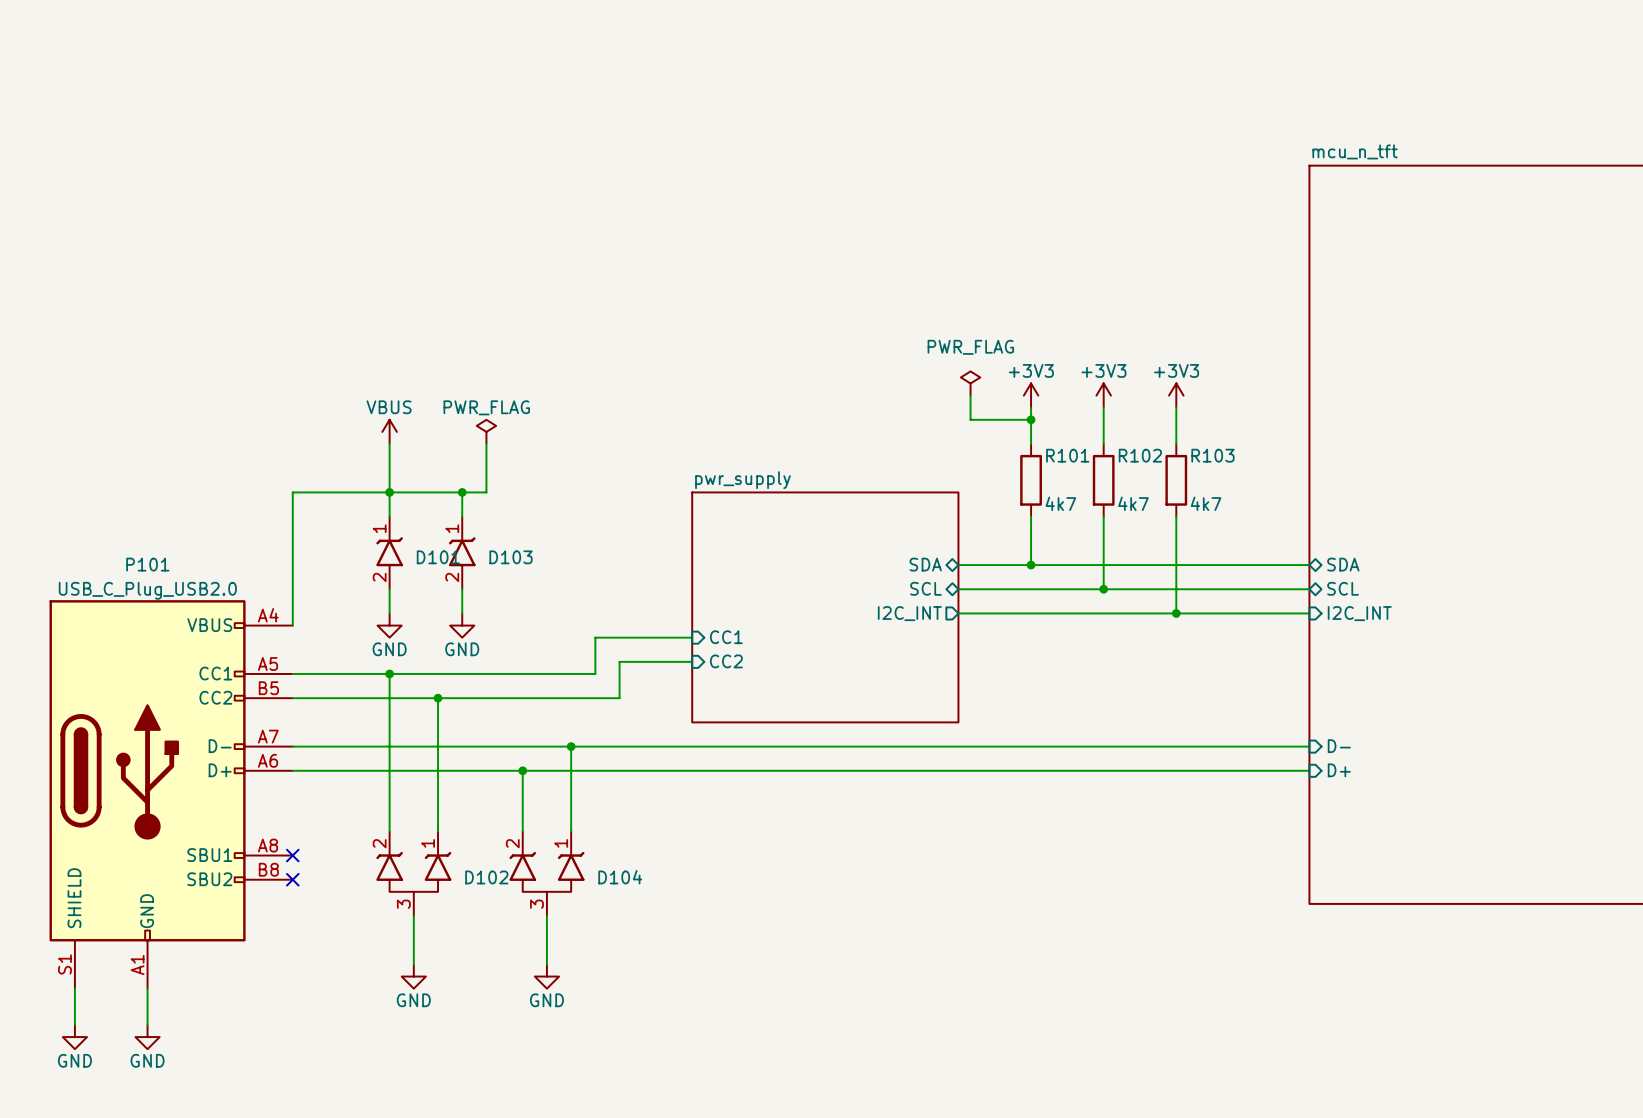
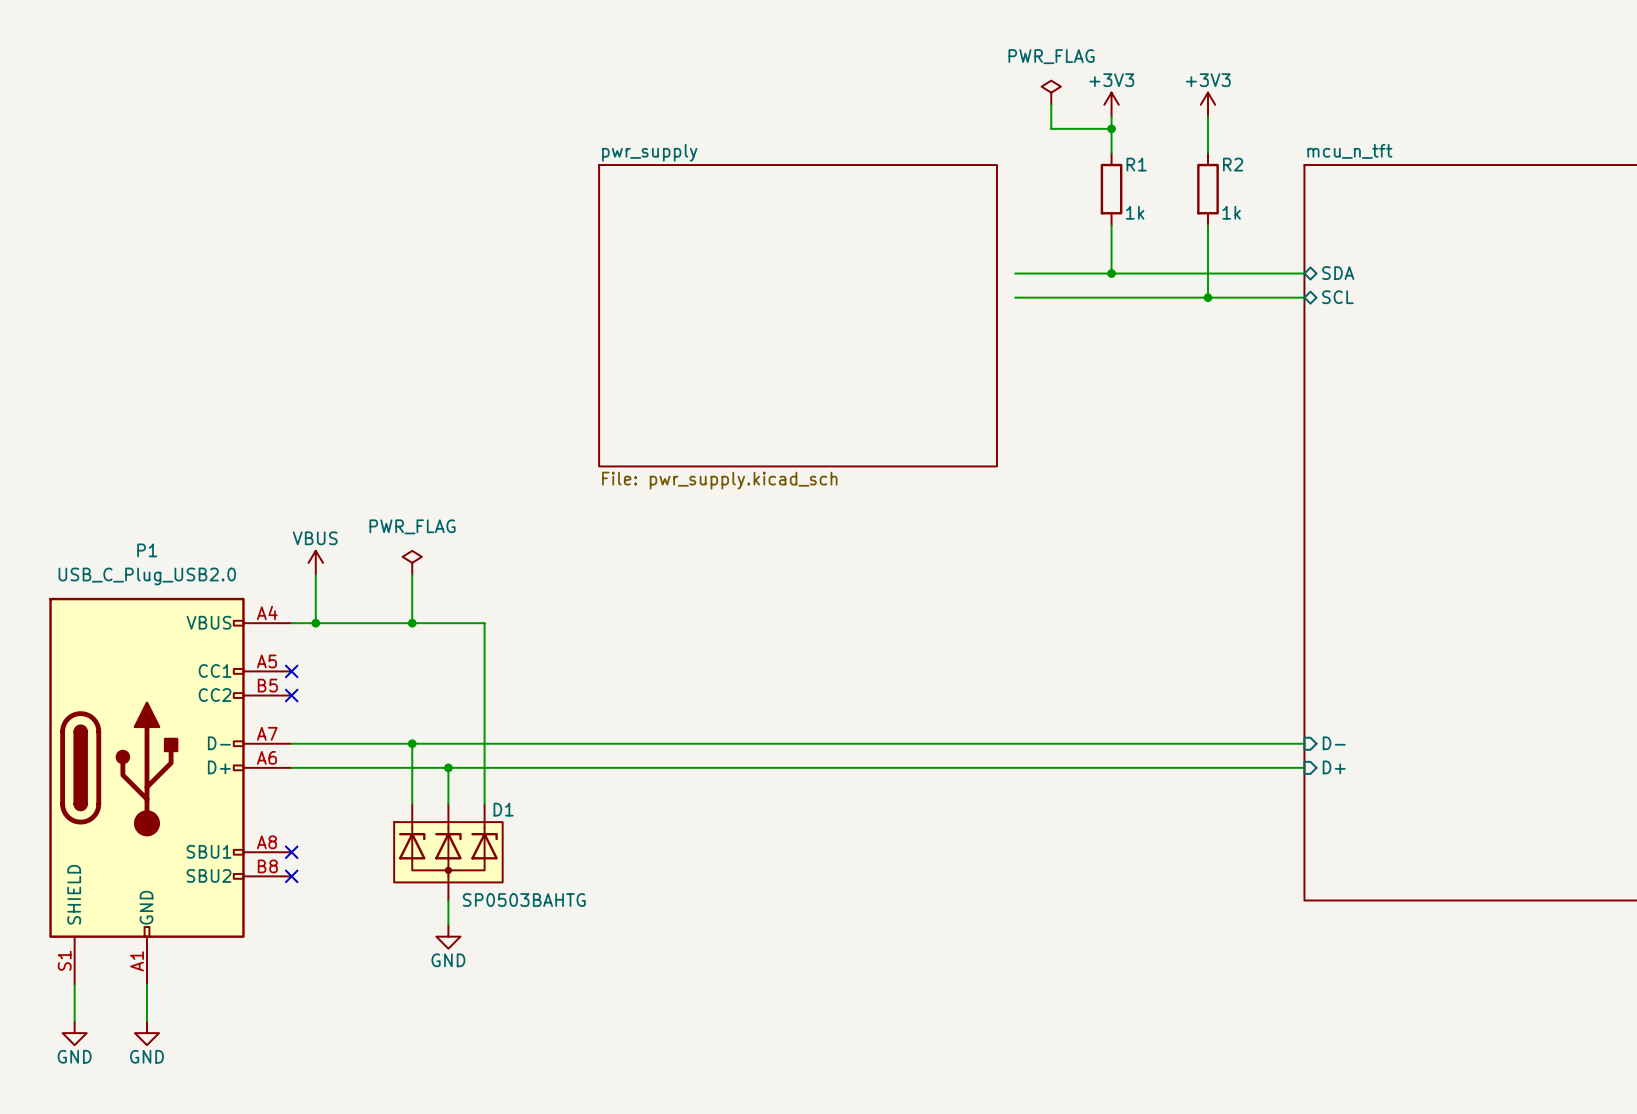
power symbol: none -> PWR_FLAG (1051, 92)
wire: none -> (1051, 104) (1051, 128) (1111, 128)
power symbol: none -> +3V3 (1111, 104)
power symbol: none -> +3V3 (1208, 104)
wire: none -> (1111, 116) (1111, 152)
wire: none -> (1208, 116) (1208, 152)
junction: none -> (1111, 128)
R1: none -> 1k (1111, 189)
R2: none -> 1k (1208, 189)
wire: none -> (1111, 225) (1111, 273)
wire: none -> (1208, 225) (1208, 297)
wire: none -> (1015, 273) (1304, 273)
junction: none -> (1111, 273)
sheet pin: none -> SDA (1338, 273)
wire: none -> (1015, 297) (1304, 297)
junction: none -> (1208, 297)
sheet pin: none -> SCL (1337, 297)
sheet pwr_supply: none -> File: pwr_supply.kicad_sch (798, 315)
power symbol: PWR_FLAG (970, 383) -> none
wire: (970, 395) (970, 419) (1031, 419) -> none
power symbol: +3V3 (1031, 395) -> none
power symbol: +3V3 (1103, 395) -> none
power symbol: +3V3 (1176, 395) -> none
power symbol text position: PWR_FLAG (486, 407) -> PWR_FLAG (412, 526)
wire: (1031, 407) (1031, 444) -> none
wire: (1103, 407) (1103, 444) -> none
wire: (1176, 407) (1176, 444) -> none
junction: (1031, 419) -> none
power symbol position: VBUS (389, 431) -> VBUS (315, 562)
power symbol position: PWR_FLAG (486, 431) -> PWR_FLAG (412, 562)
wire: (389, 444) (389, 516) -> none
wire: (486, 444) (486, 492) (292, 492) (292, 625) -> (484, 804) (484, 623) (291, 623)
R101: 4k7 (1031, 480) -> none
R102: 4k7 (1103, 480) -> none
R103: 4k7 (1176, 480) -> none
junction: (389, 492) -> none
wire: (462, 492) (462, 516) -> none
junction: (462, 492) -> none
wire: (1031, 516) (1031, 565) -> none
wire: (1103, 516) (1103, 589) -> none
wire: (1176, 516) (1176, 613) -> none
D101: (389, 552) -> none
D103: (462, 552) -> none
sheet pin: SDA (925, 564) -> none
sheet pin: SDA (1343, 564) -> none
wire: (958, 565) (1309, 565) -> none
junction: (1031, 565) -> none
wire: none -> (315, 574) (315, 623)
wire: none -> (412, 574) (412, 623)
sheet pin: SCL (925, 588) -> none
sheet pin: SCL (1343, 588) -> none
wire: (389, 589) (389, 613) -> none
wire: (462, 589) (462, 613) -> none
wire: (958, 589) (1309, 589) -> none
junction: (1103, 589) -> none
sheet pwr_supply: (825, 607) -> none
sheet pin: I2C_INT (909, 613) -> none
wire: (958, 613) (1309, 613) -> none
junction: (1176, 613) -> none
sheet pin: I2C_INT (1359, 613) -> none
junction: none -> (315, 623)
power symbol: GND (389, 625) -> none
junction: none -> (412, 623)
power symbol: GND (462, 625) -> none
wire: (692, 637) (595, 637) (595, 673) (292, 673) -> none
sheet pin: CC1 (726, 637) -> none
wire: (692, 661) (619, 661) (619, 698) (292, 698) -> none
sheet pin: CC2 (726, 661) -> none
no-connect mark: none -> (291, 671)
wire: (389, 673) (389, 831) -> none
junction: (389, 673) -> none
no-connect mark: none -> (291, 695)
wire: (438, 698) (438, 831) -> none
junction: (438, 698) -> none
junction: none -> (412, 743)
wire: (571, 746) (571, 831) -> none
junction: (571, 746) -> none
wire: none -> (448, 767) (448, 804)
junction: none -> (448, 767)
wire: (522, 770) (522, 831) -> (412, 743) (412, 804)
junction: (522, 770) -> none
P101: USB_C_Plug_USB2.0 (171, 794) -> none
P1: none -> USB_C_Plug_USB2.0 (170, 791)
D1: none -> SP0503BAHTG (448, 852)
D102: (413, 873) -> none
D104: (546, 873) -> none
wire: none -> (448, 900) (448, 924)
wire: (413, 916) (413, 964) -> none
wire: (546, 916) (546, 964) -> none
power symbol position: GND (413, 976) -> GND (448, 936)
power symbol: GND (546, 976) -> none

